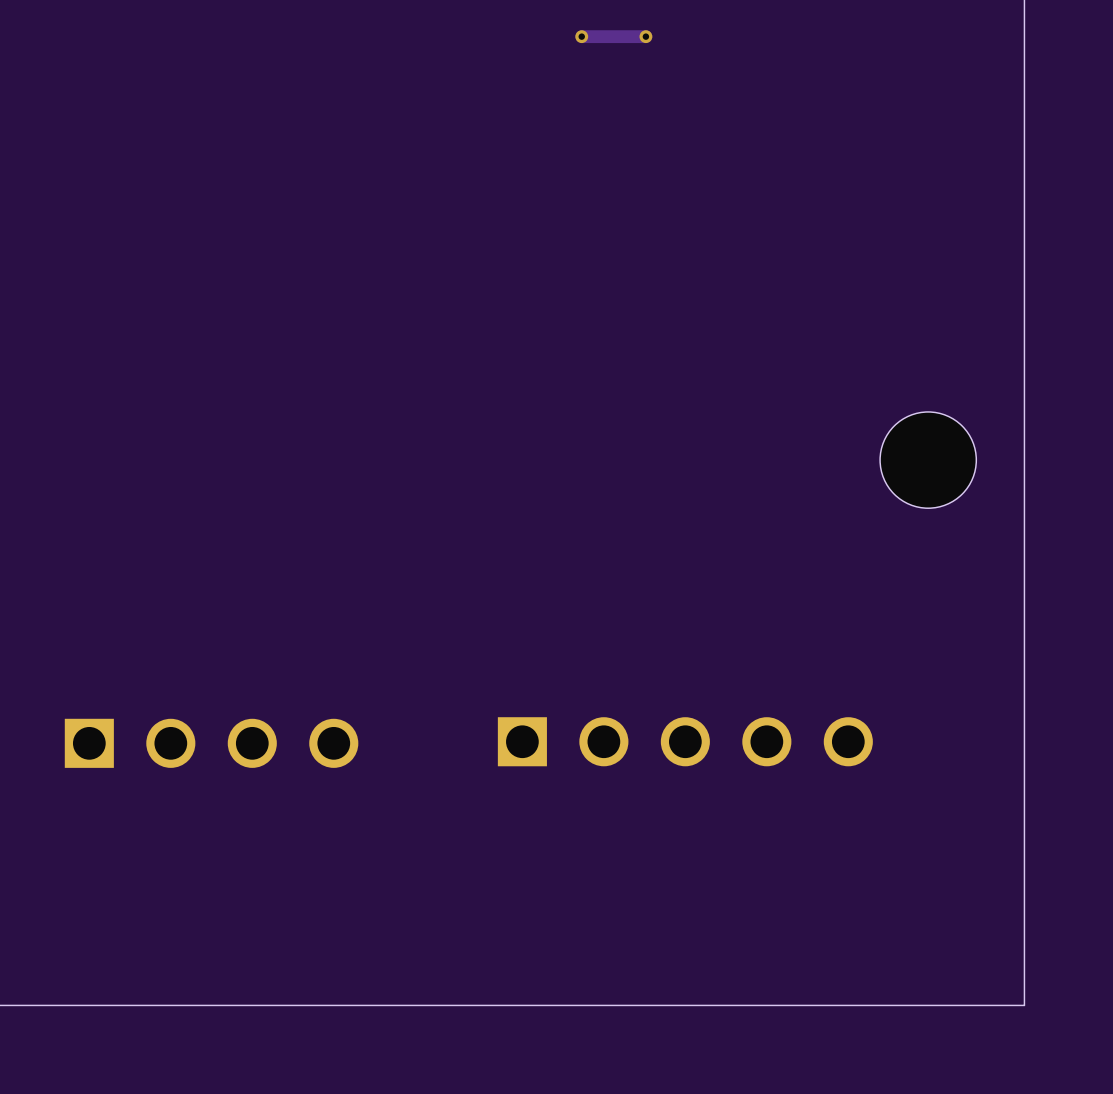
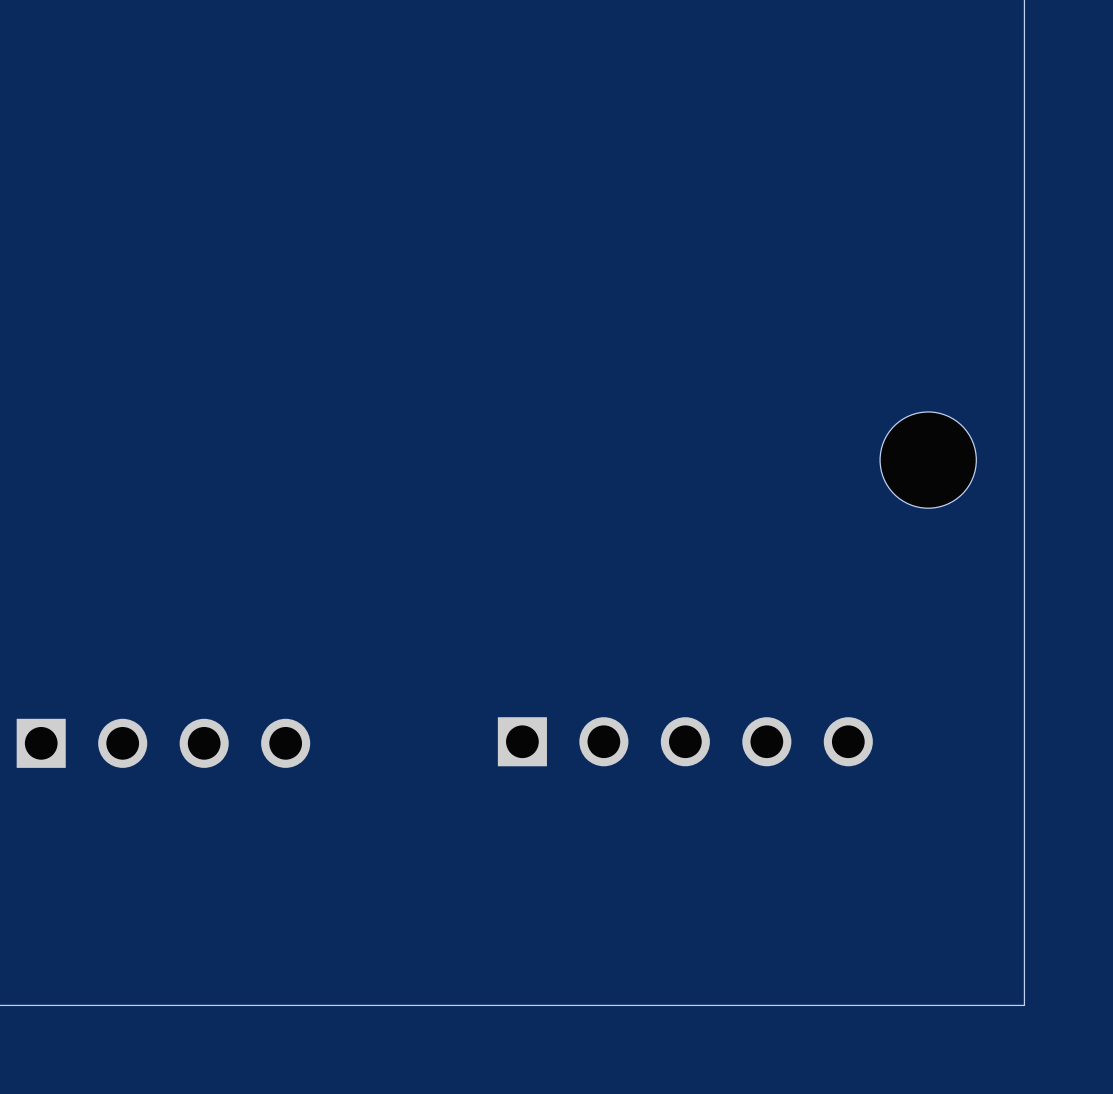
via: (581, 36) -> none
track: (645, 36) (581, 36) -> none
via: (645, 36) -> none
part position: (211, 743) -> (163, 743)

